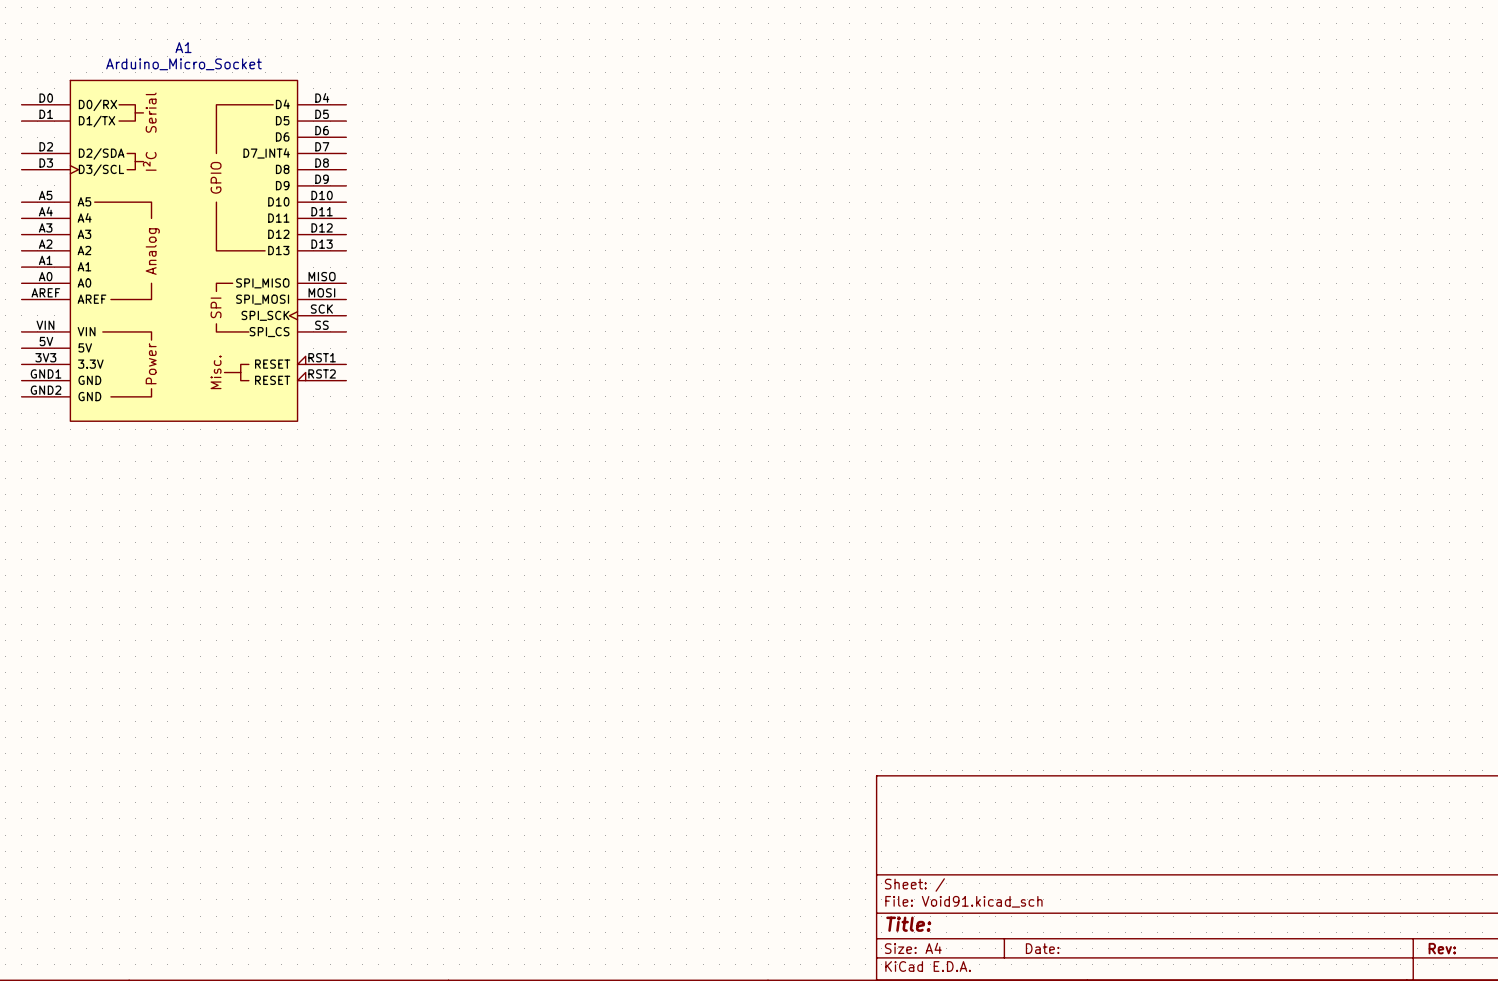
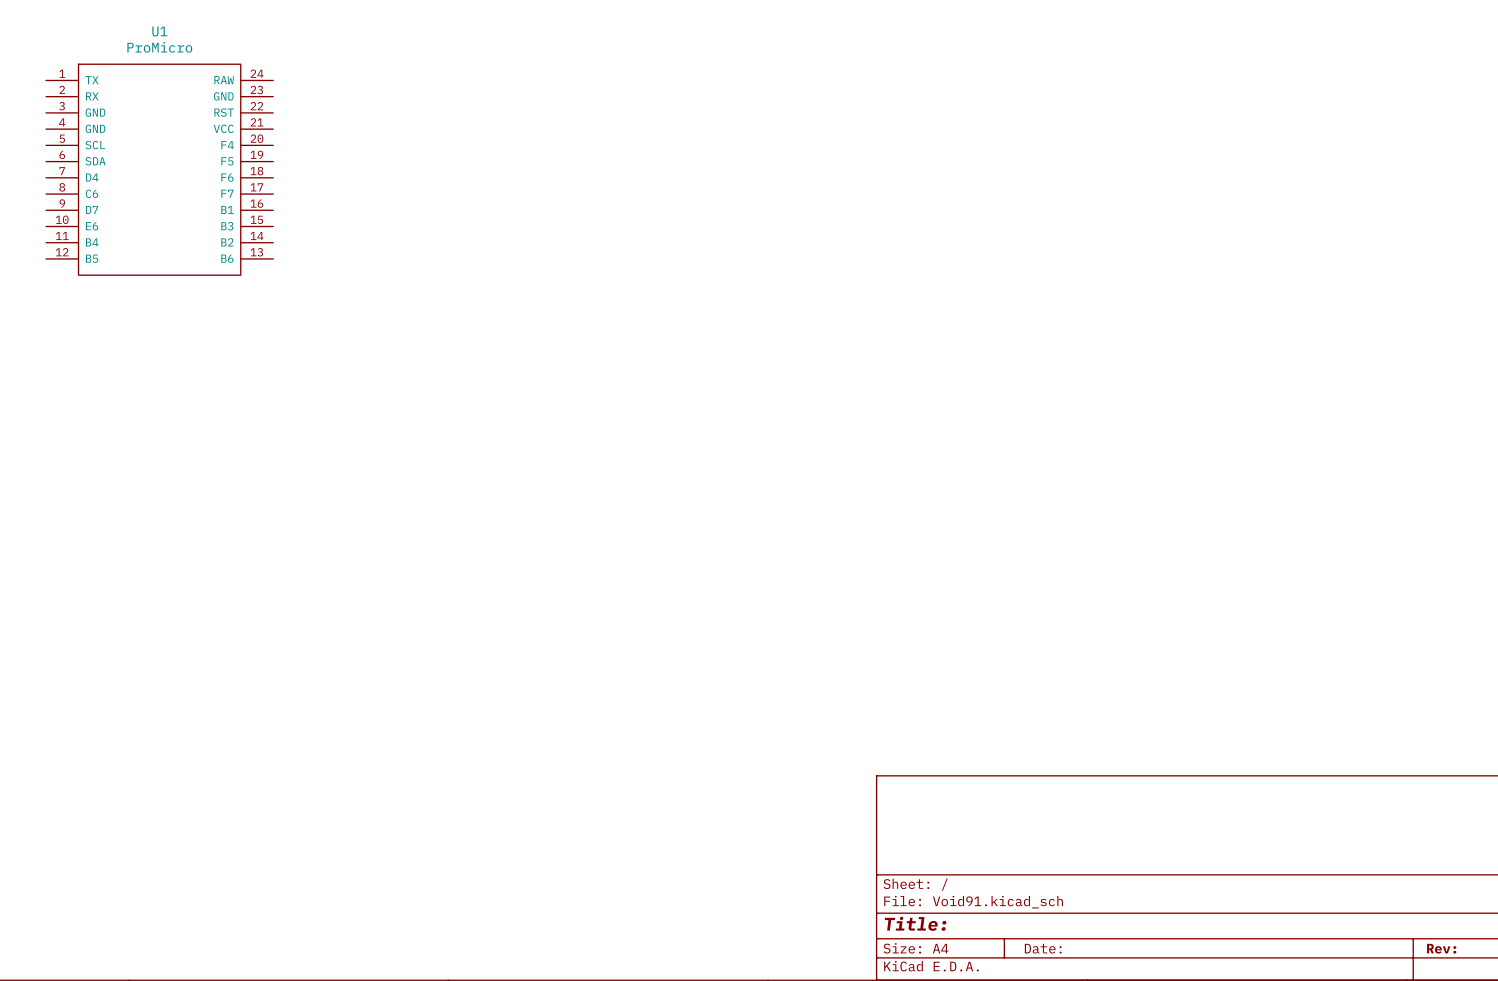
U1: none -> ProMicro (159, 169)
A1: Arduino_Micro_Socket (183, 250) -> none

